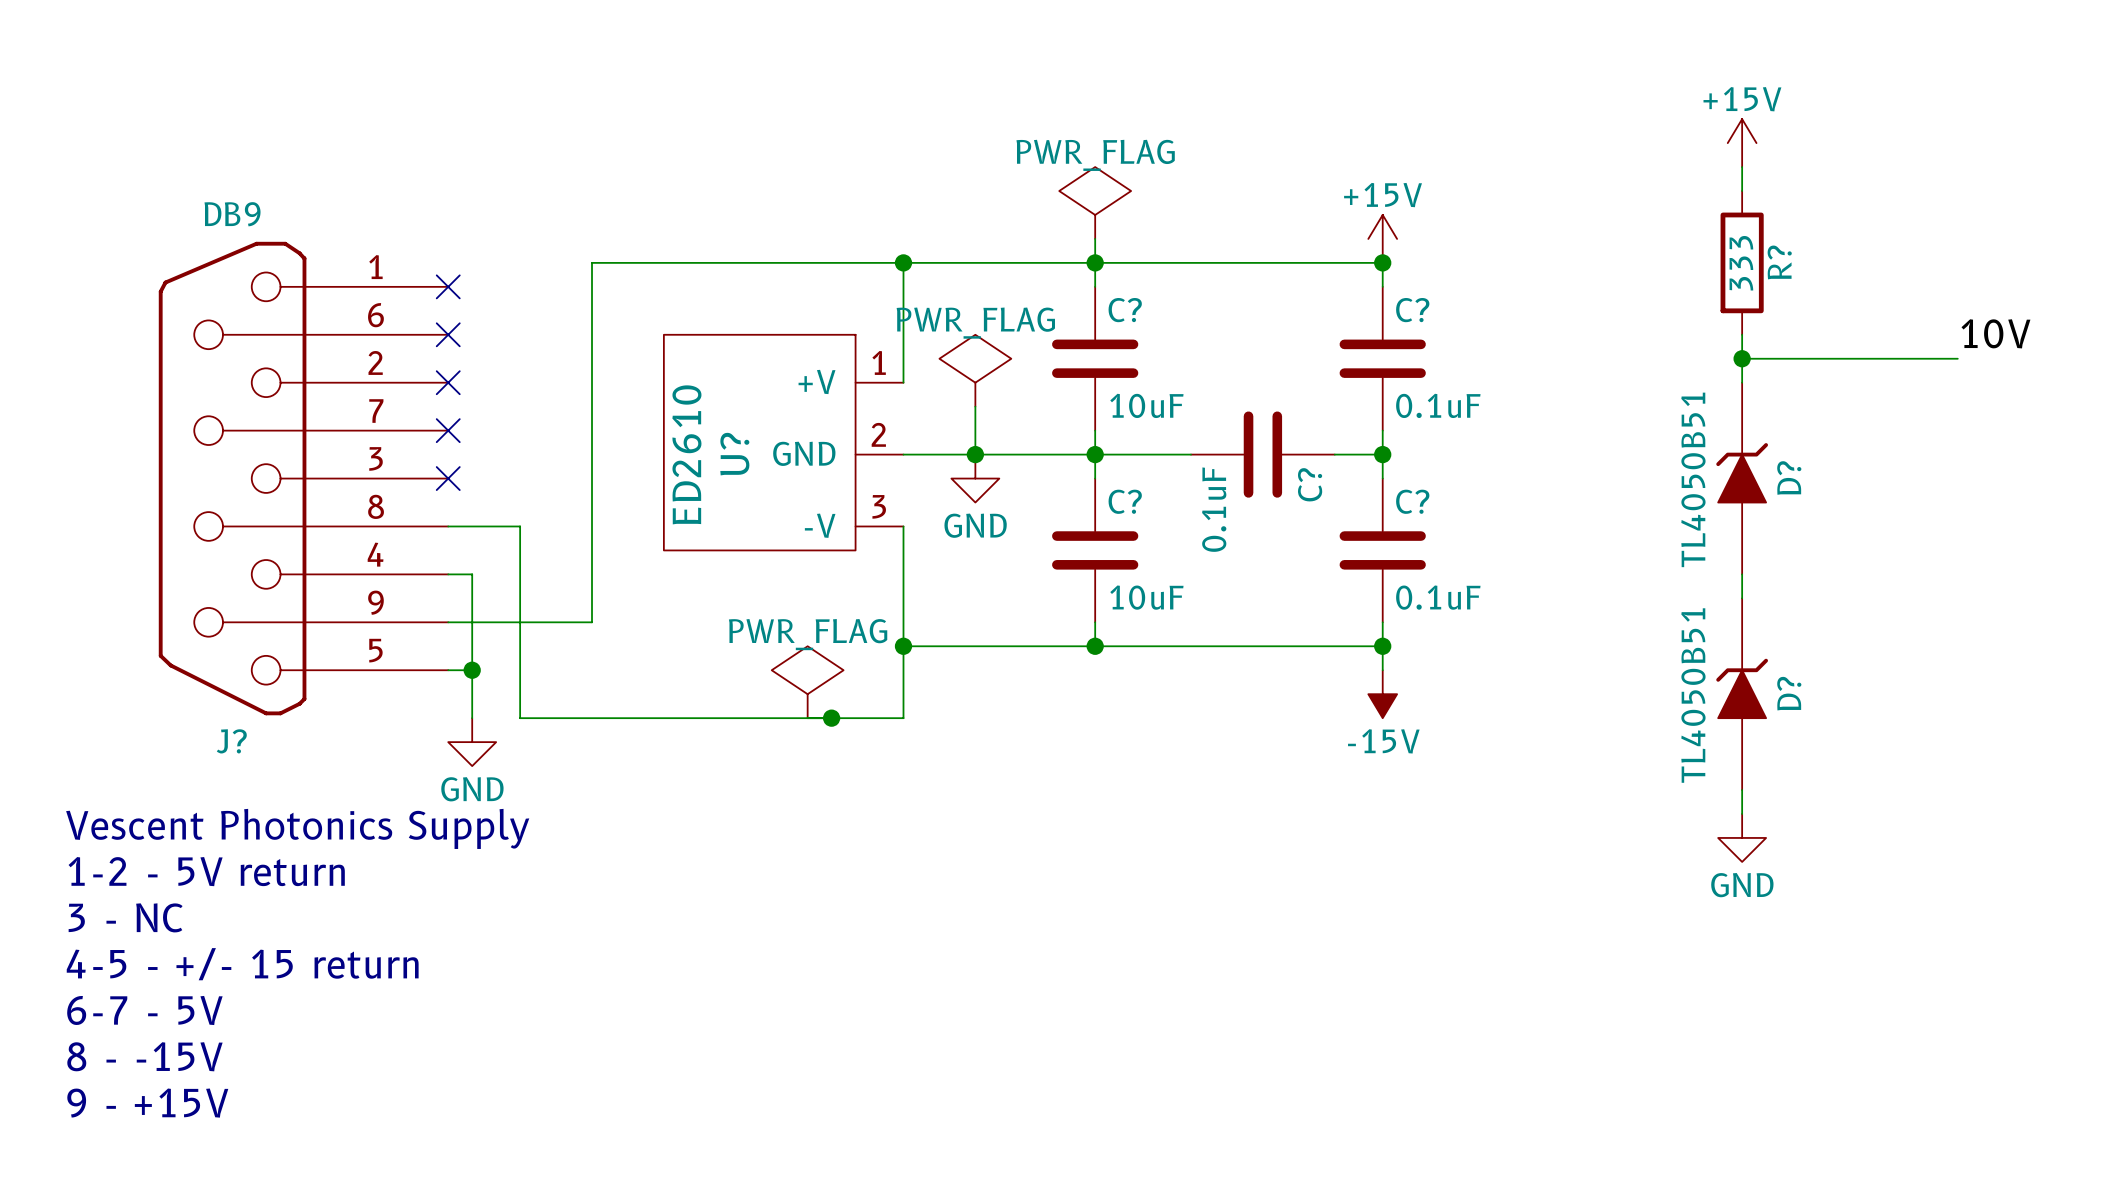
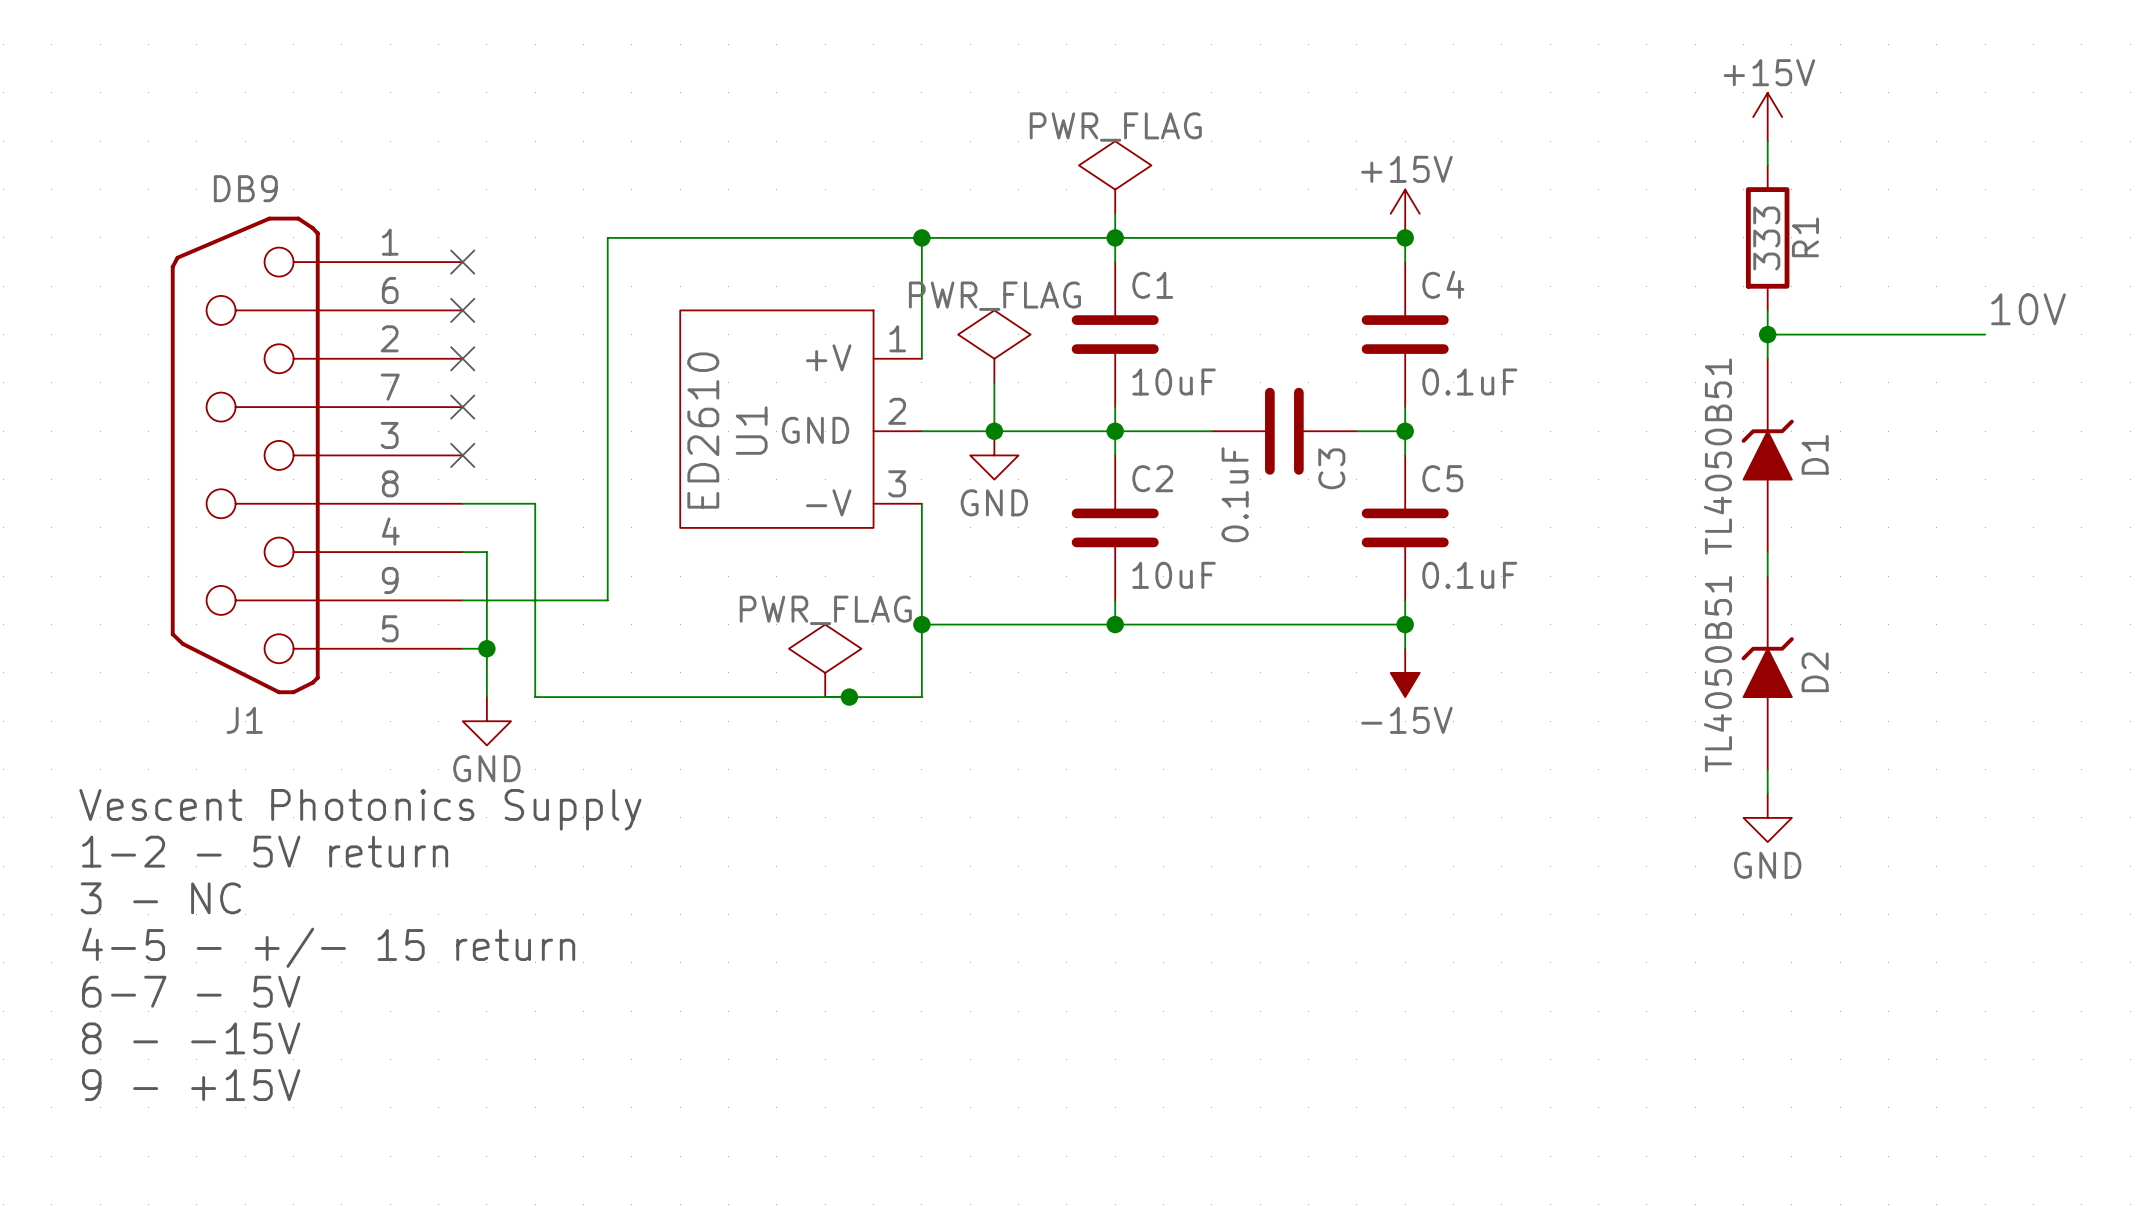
R? name: R? (1779, 262) -> R1 (1805, 237)
C? name: C? (1125, 310) -> C1 (1152, 285)
C? name: C? (1412, 310) -> C4 (1443, 284)
U? name: U? (734, 454) -> U1 (751, 430)
D? name: D? (1789, 478) -> D1 (1815, 454)
C? name: C? (1310, 484) -> C3 (1331, 468)
C? name: C? (1125, 501) -> C2 (1152, 478)
C? name: C? (1412, 501) -> C5 (1442, 478)
D? name: D? (1789, 693) -> D2 (1815, 672)
J? name: J? (231, 741) -> J1 (244, 720)

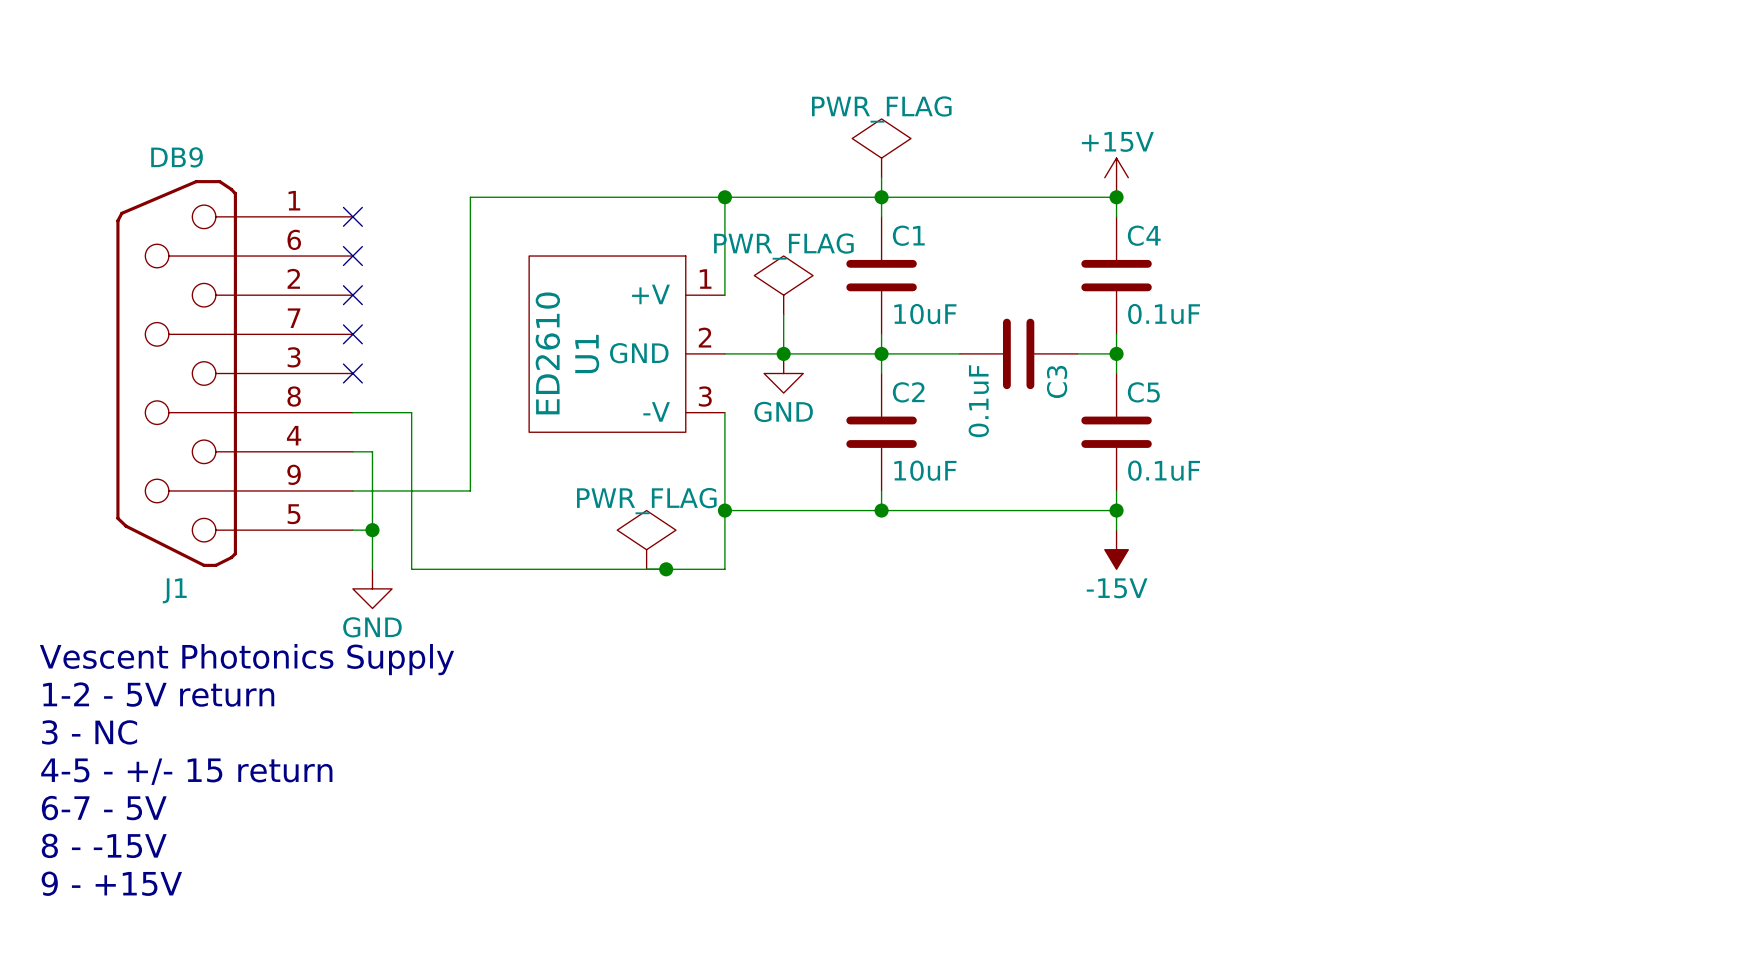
power symbol: +15V (1767, 117) -> none
wire: (1767, 141) (1767, 165) -> none
R1: 333 (1767, 237) -> none
label: 10V (2028, 309) -> none
wire: (1767, 310) (1767, 358) -> none
wire: (1767, 334) (1985, 334) -> none
junction: (1767, 334) -> none
D1: TL4050B51 (1767, 455) -> none
wire: (1767, 552) (1767, 576) -> none
D2: TL4050B51 (1767, 672) -> none
wire: (1767, 769) (1767, 793) -> none
power symbol: GND (1767, 817) -> none

